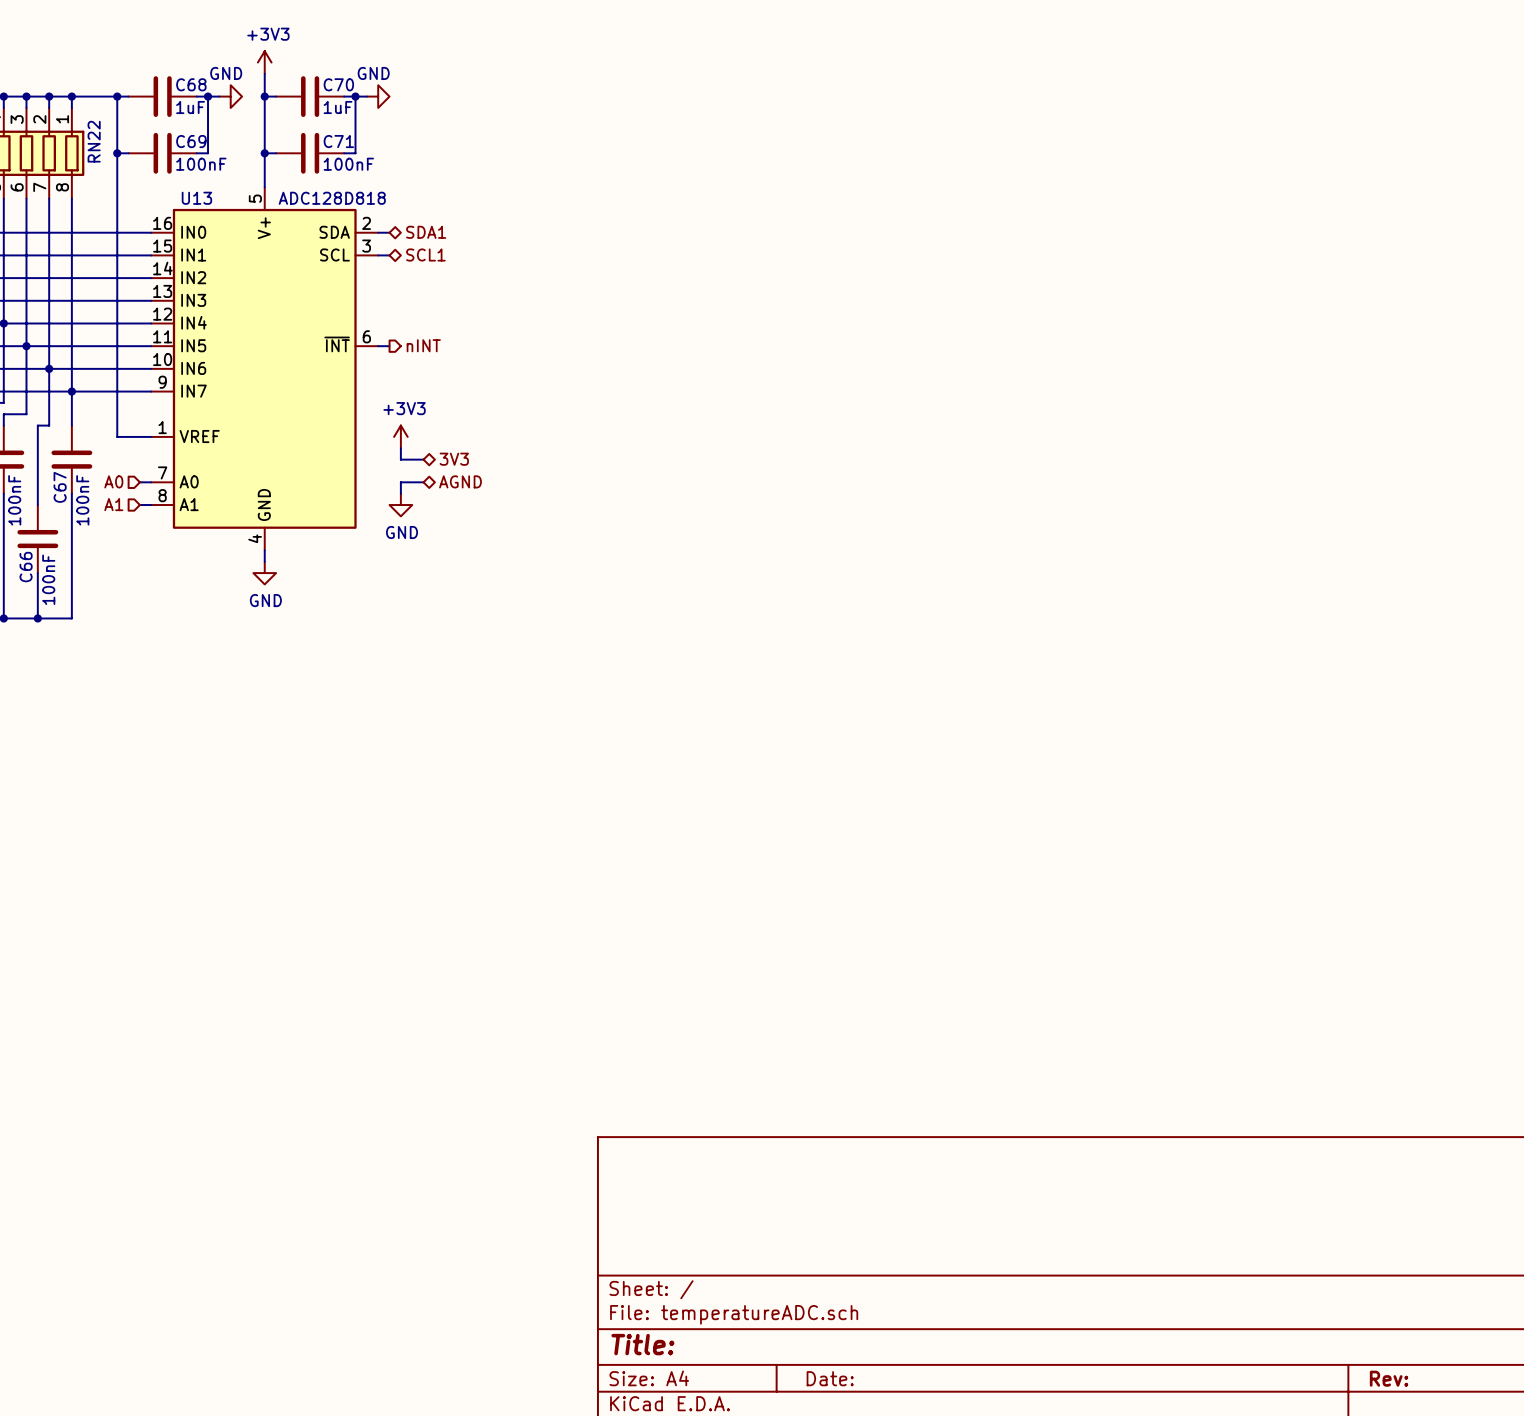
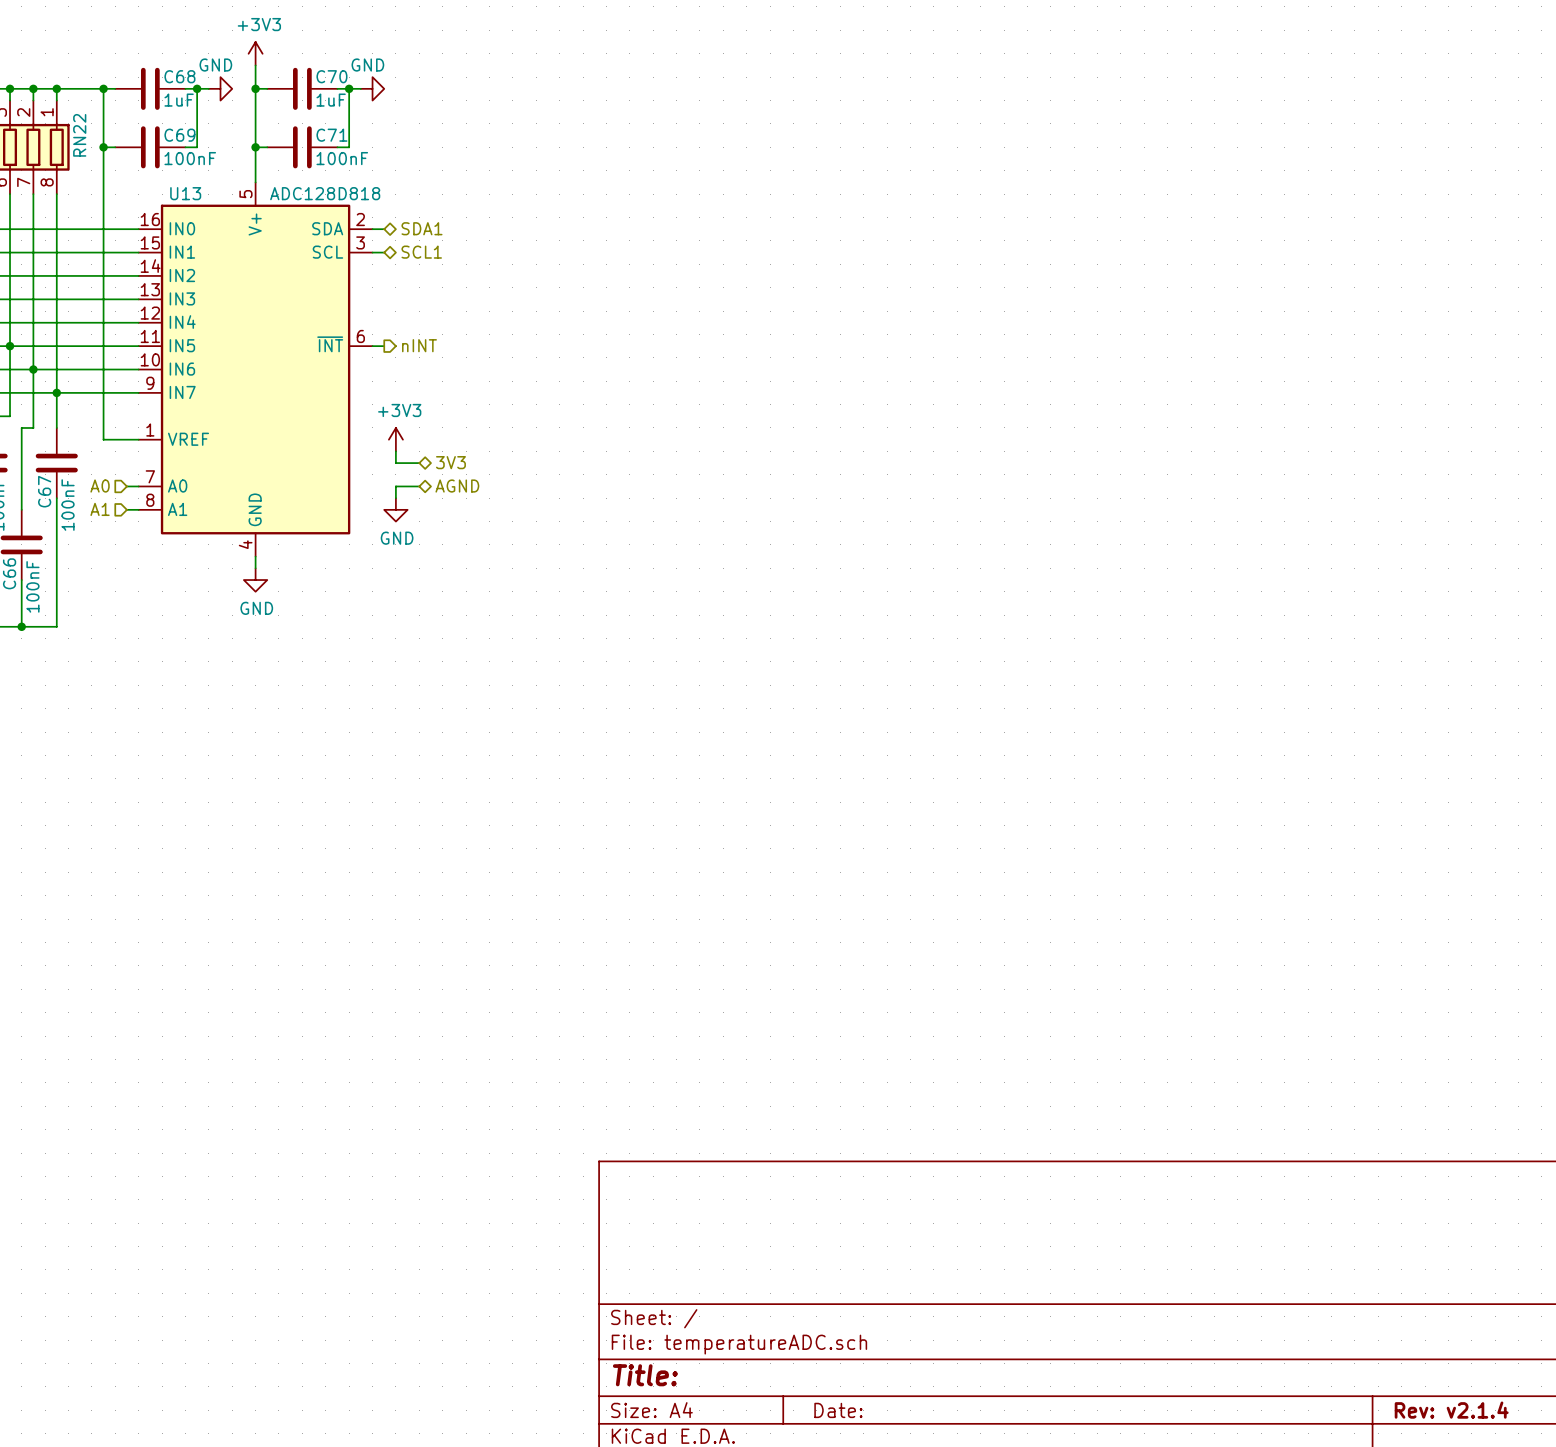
title block: Rev: (1389, 1378) -> Rev: v2.1.4 (1451, 1410)

